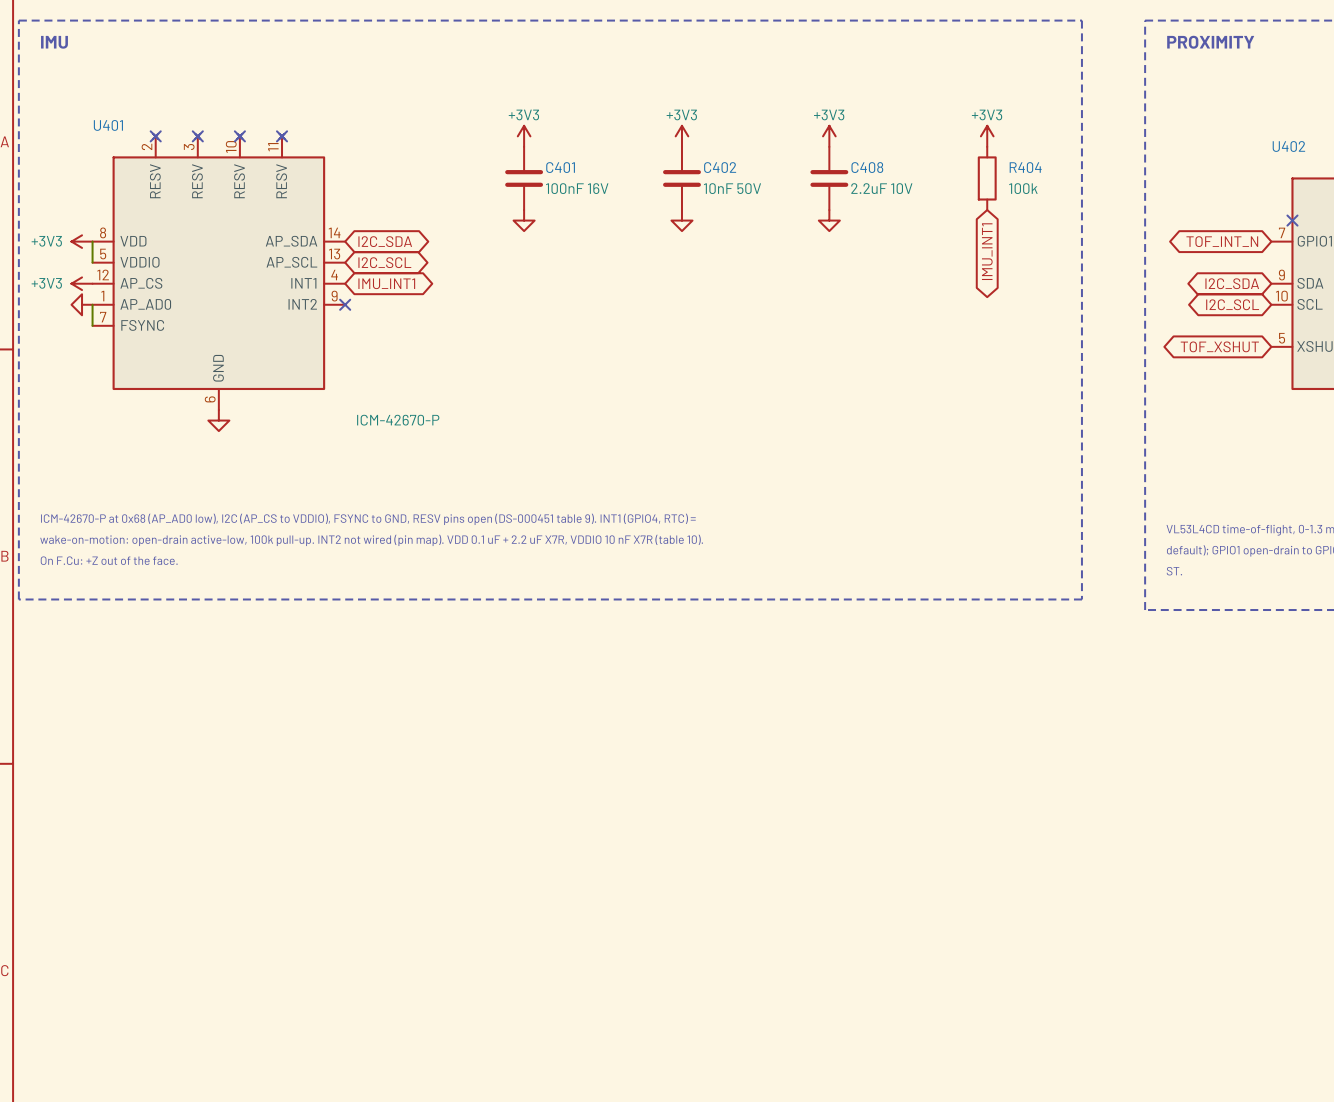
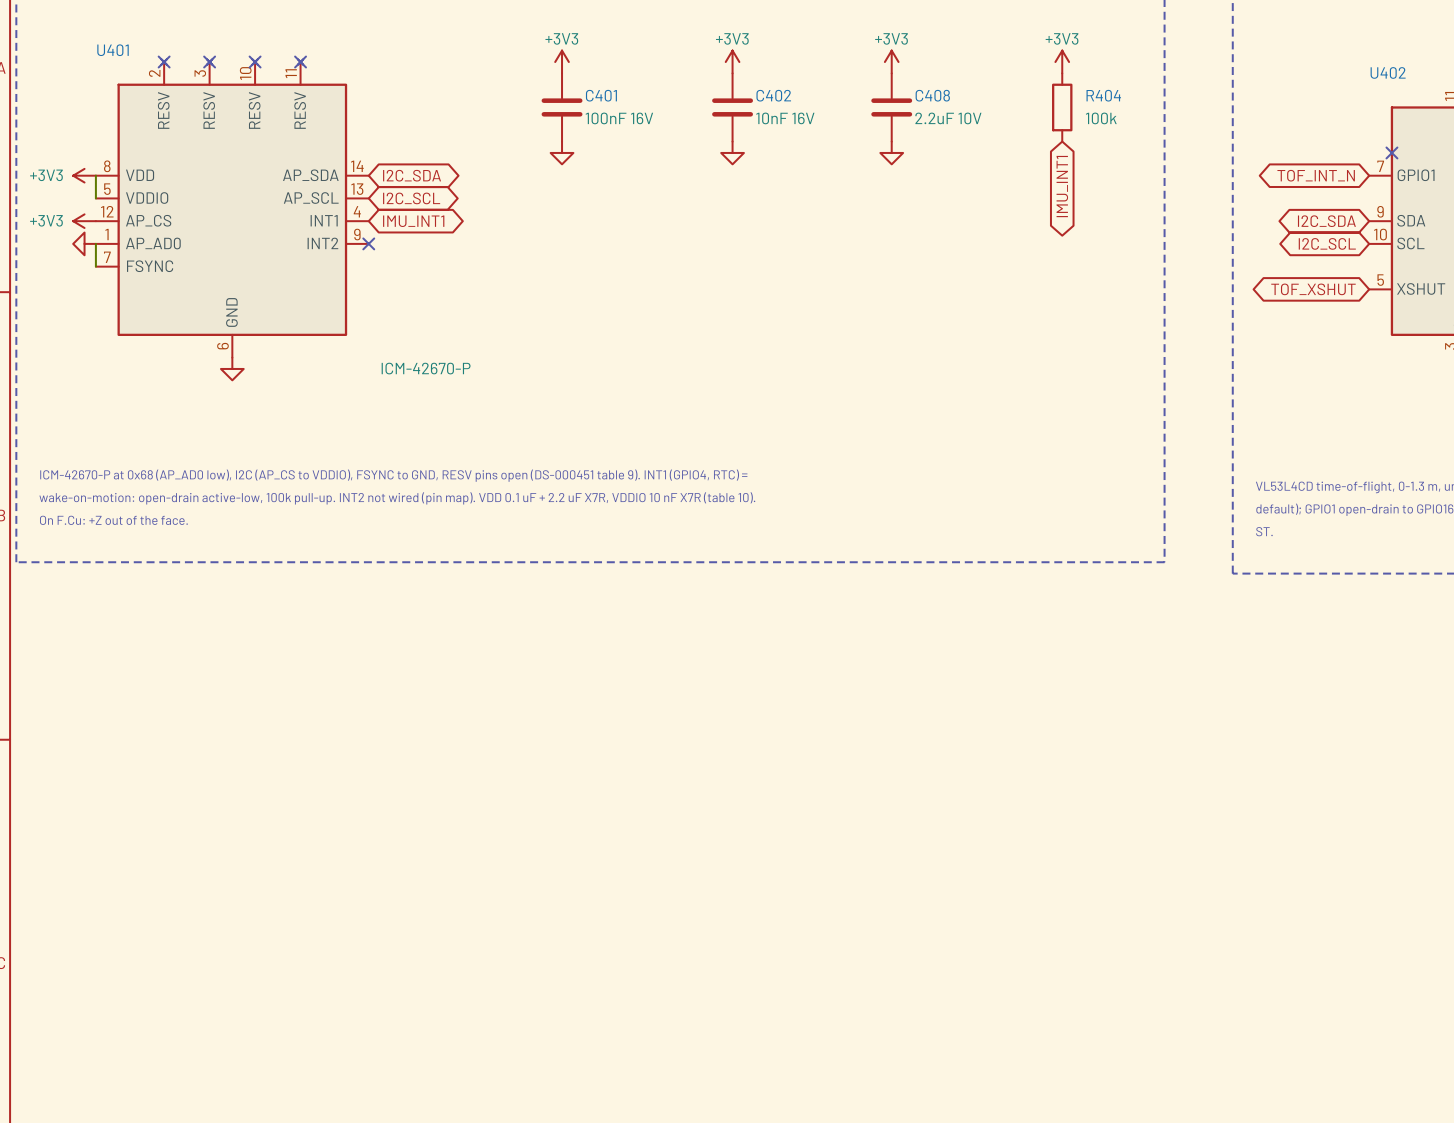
C402 value: 10nF 50V (732, 188) -> 10nF 16V (785, 118)

